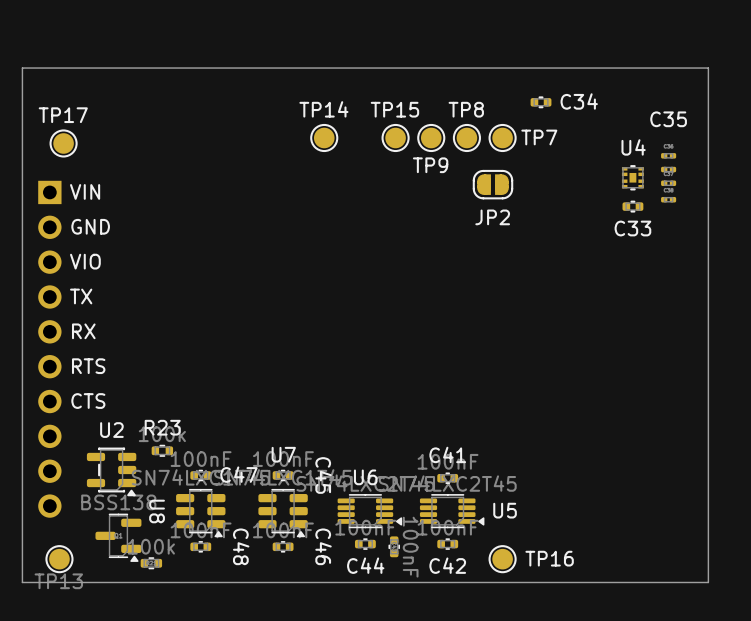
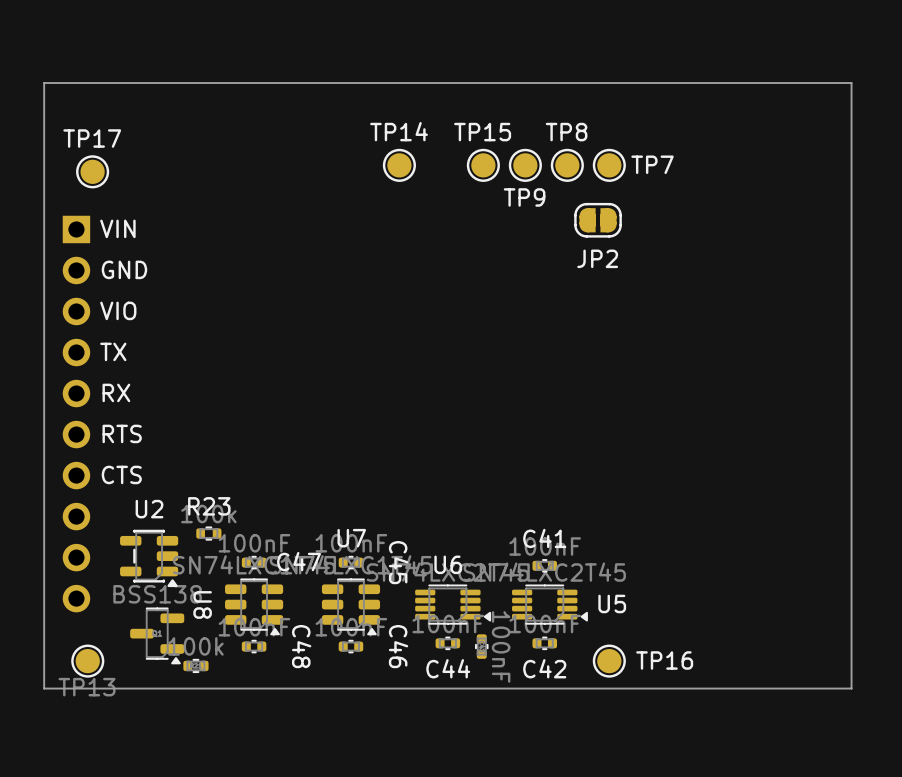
C34: (541, 102) -> none
part: (668, 155) -> none
C35: (668, 169) -> none
U4: (632, 177) -> none
part: (668, 183) -> none
part: (668, 199) -> none
C33: (632, 206) -> none

